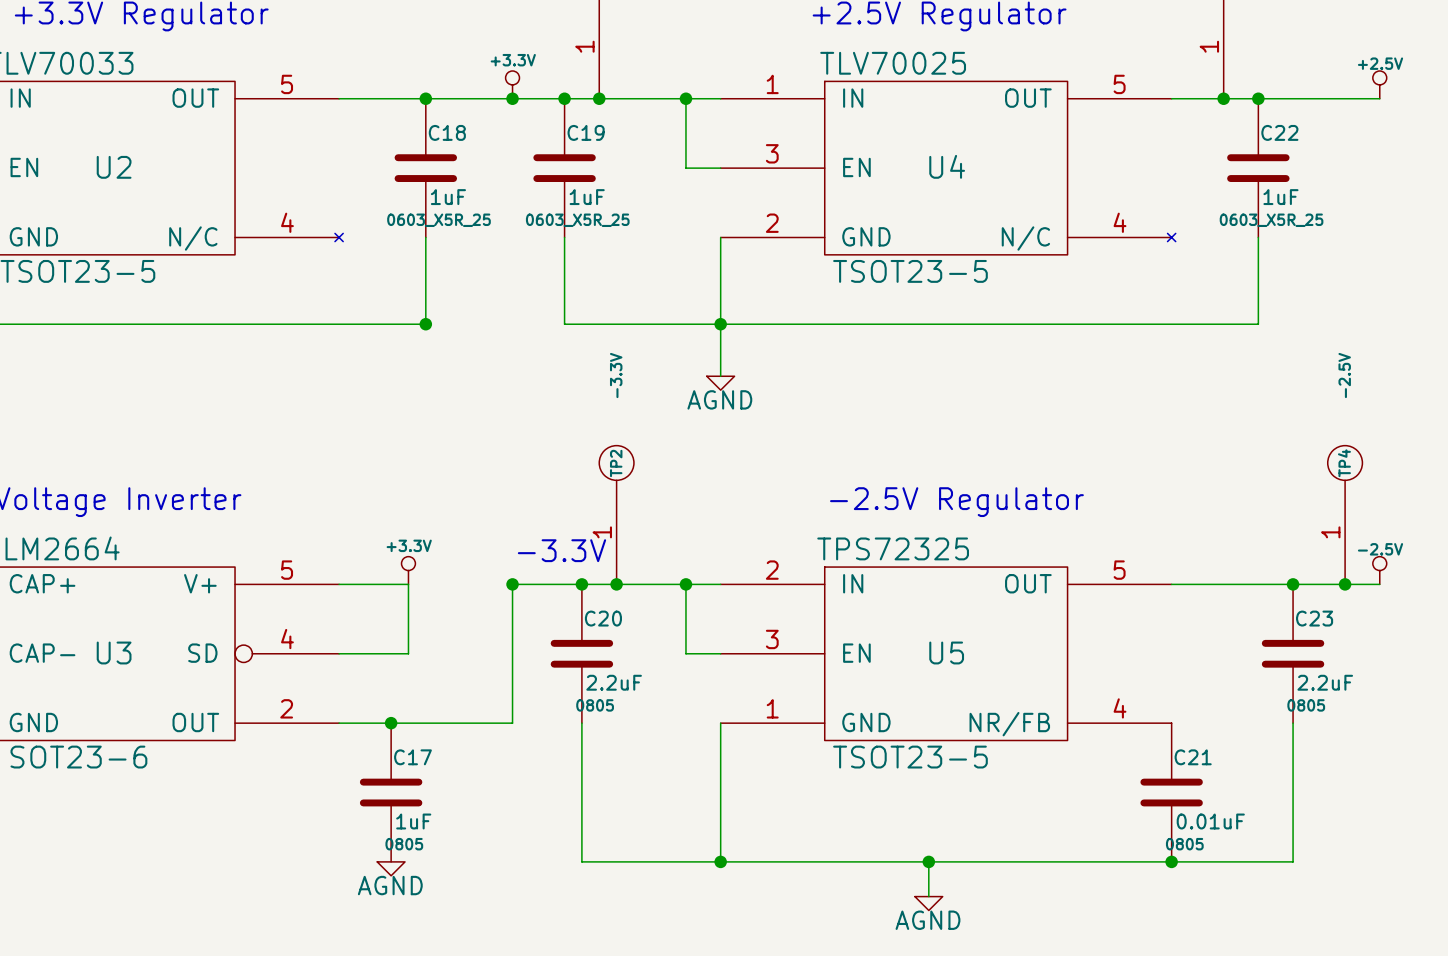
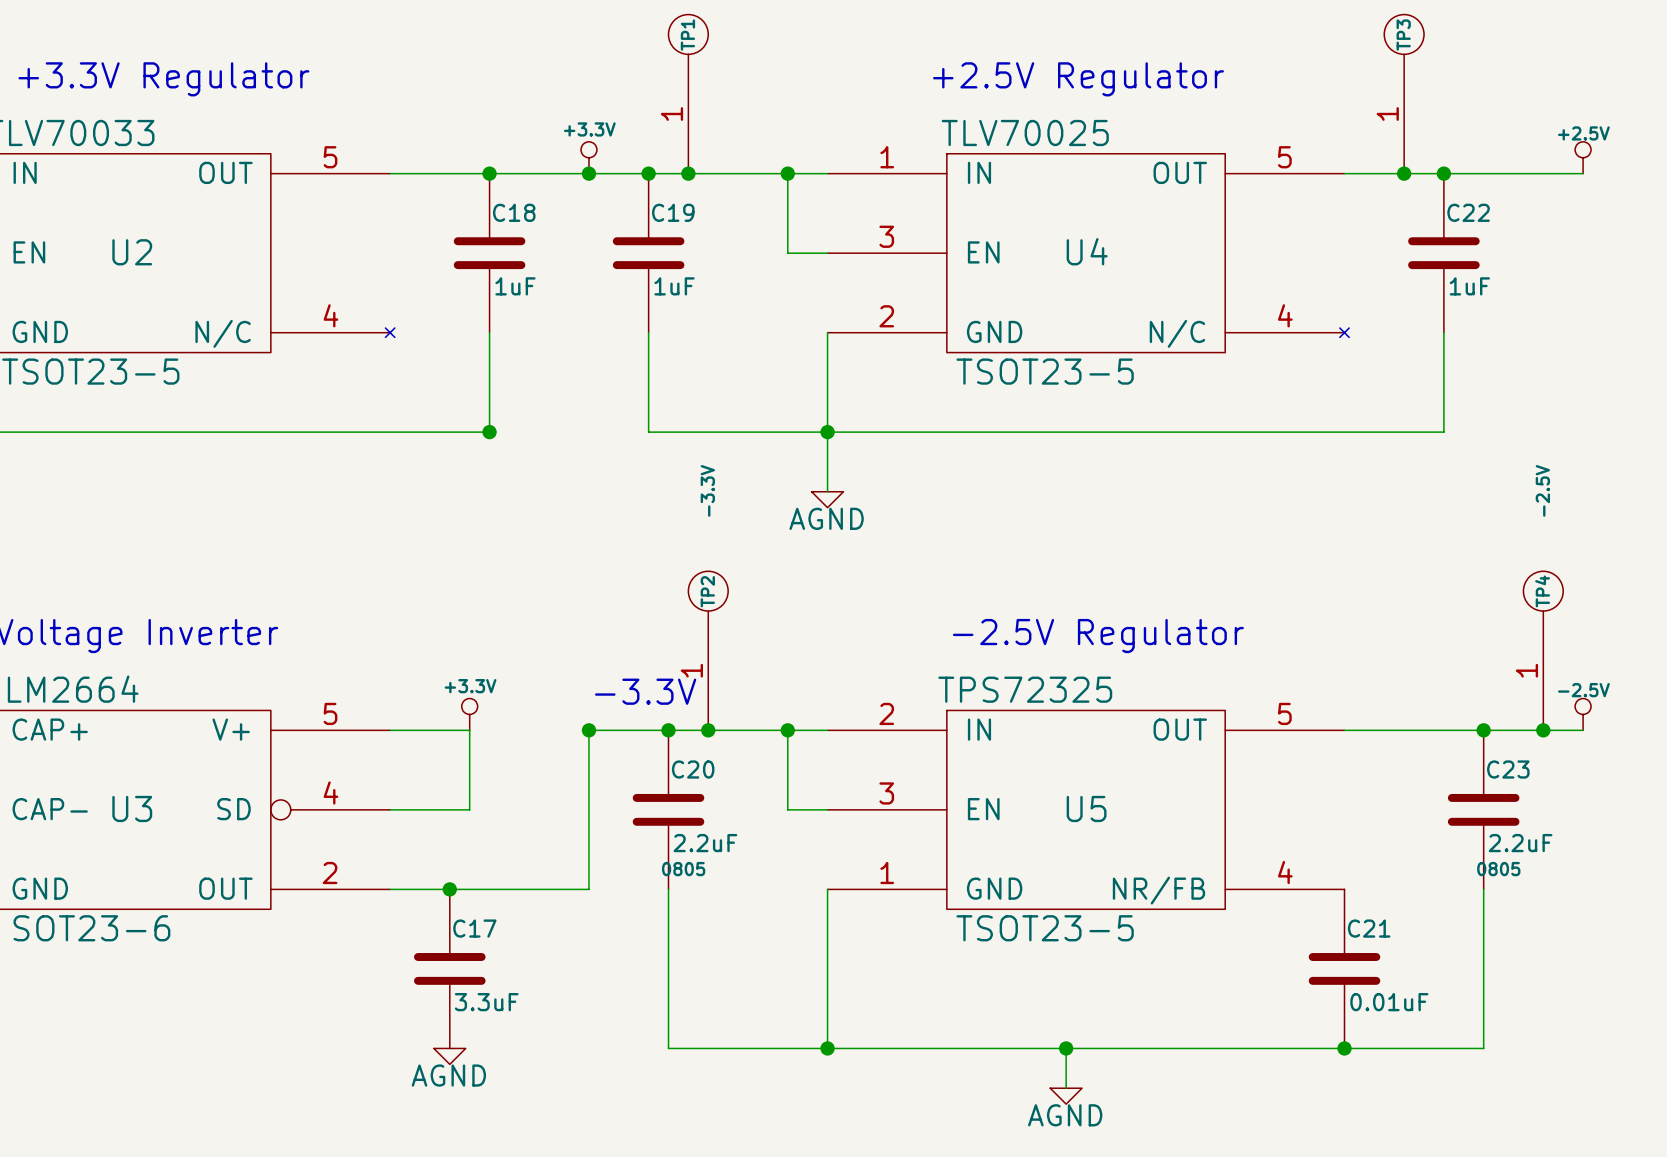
C18 text: 0603_X5R_25 (438, 220) -> none
C19 text: 0603_X5R_25 (577, 220) -> none
C22 text: 0603_X5R_25 (1271, 220) -> none
C17 value: 1uF (413, 821) -> 3.3uF (486, 1002)
C17 text: 0805 (404, 844) -> none
C21 text: 0805 (1184, 844) -> none

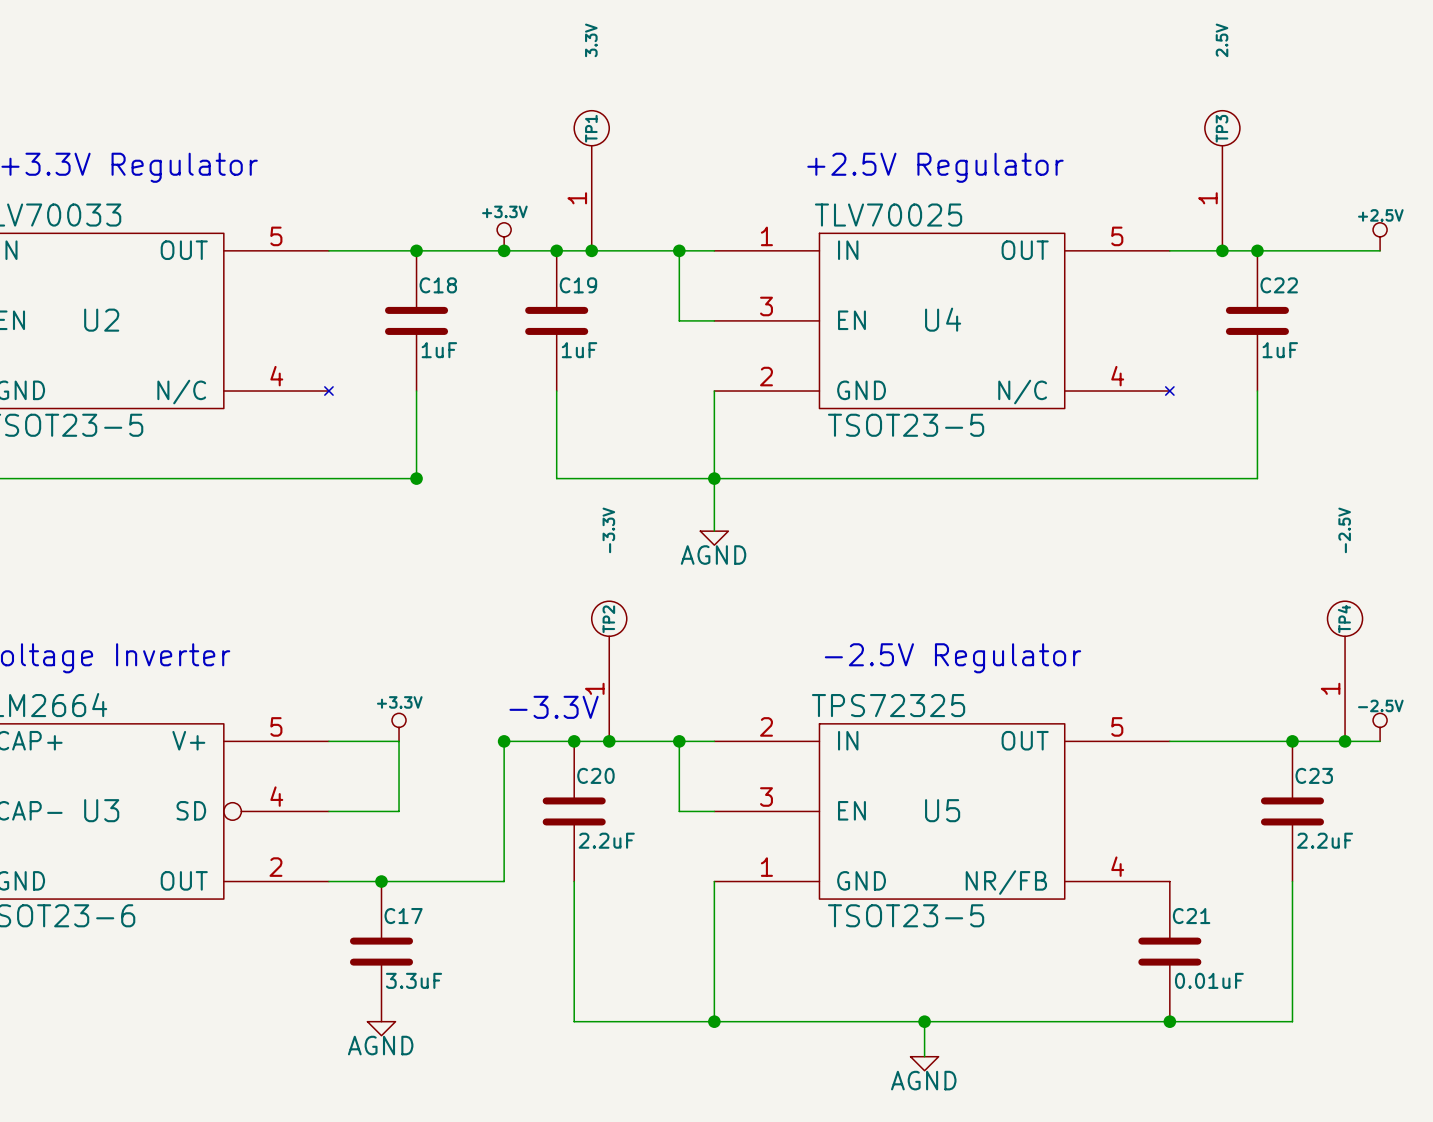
C20 text: 0805 (683, 869) -> none
C23 text: 0805 (1498, 869) -> none

